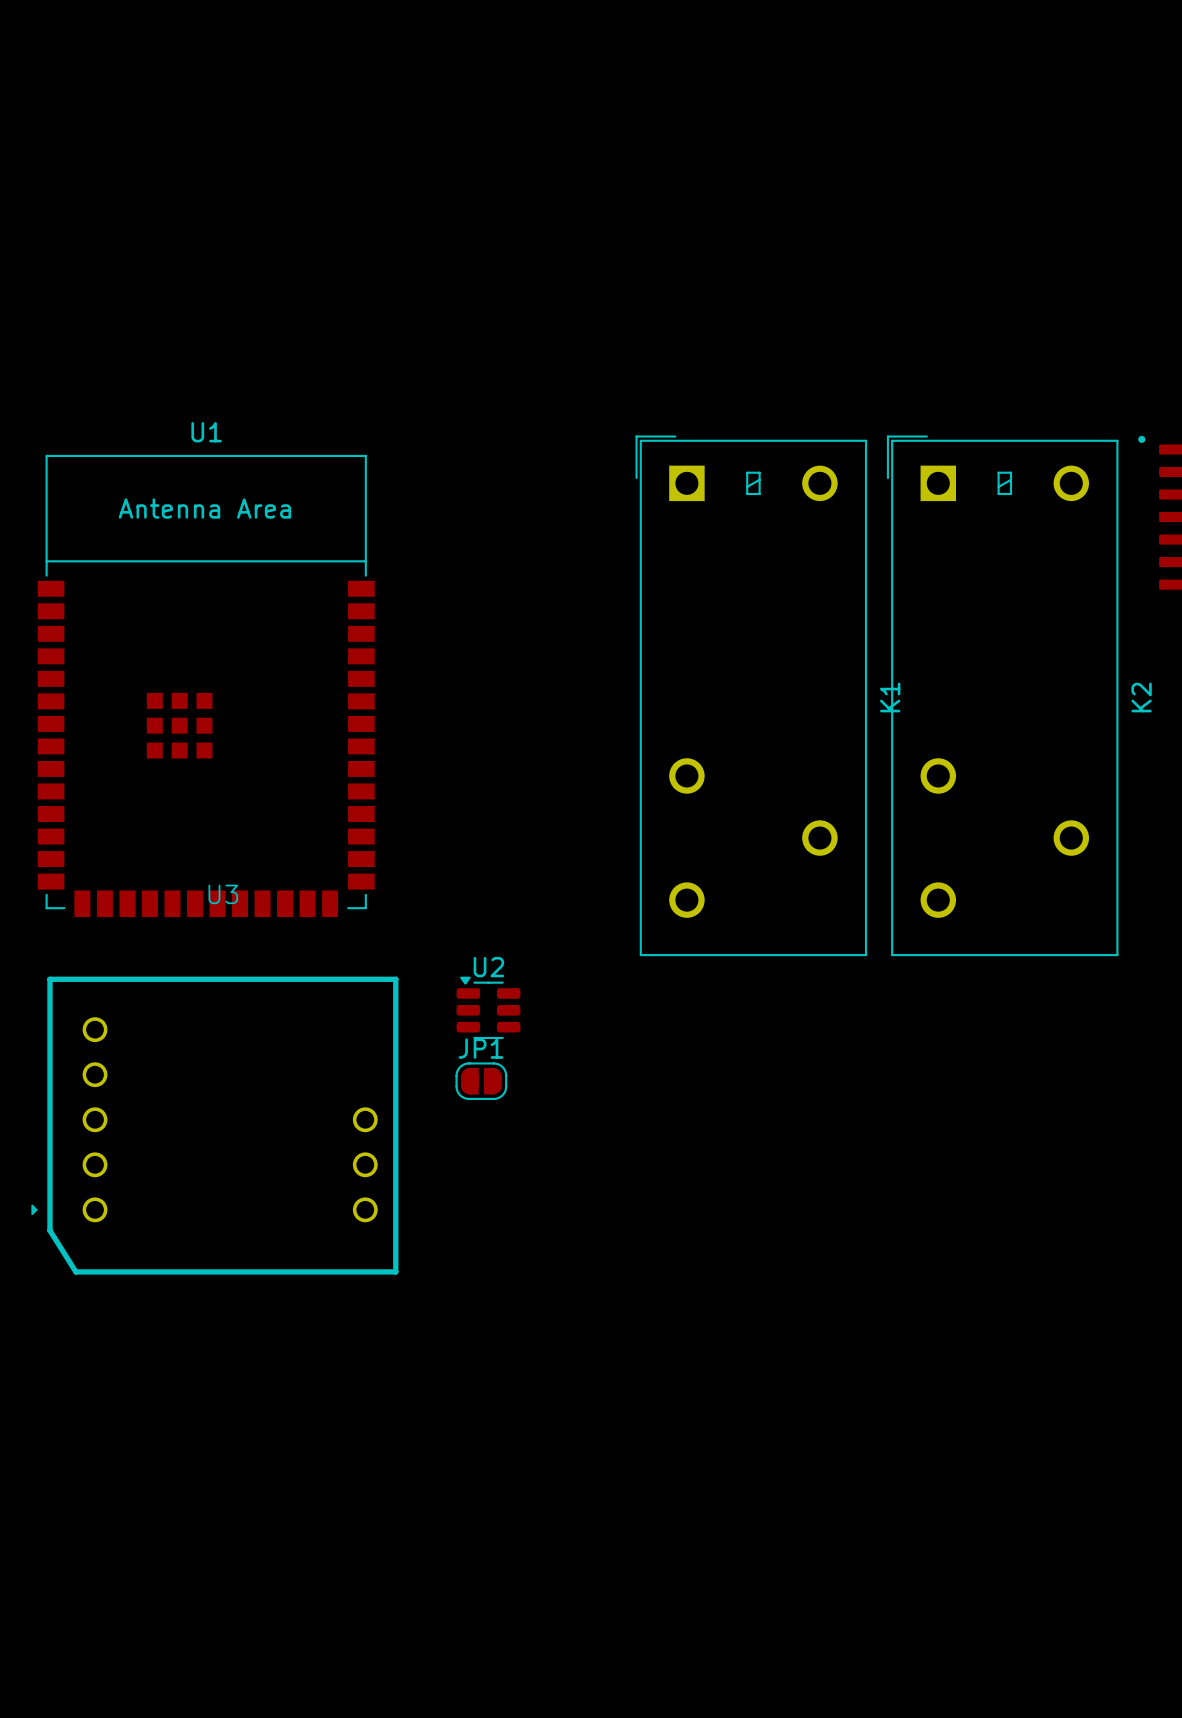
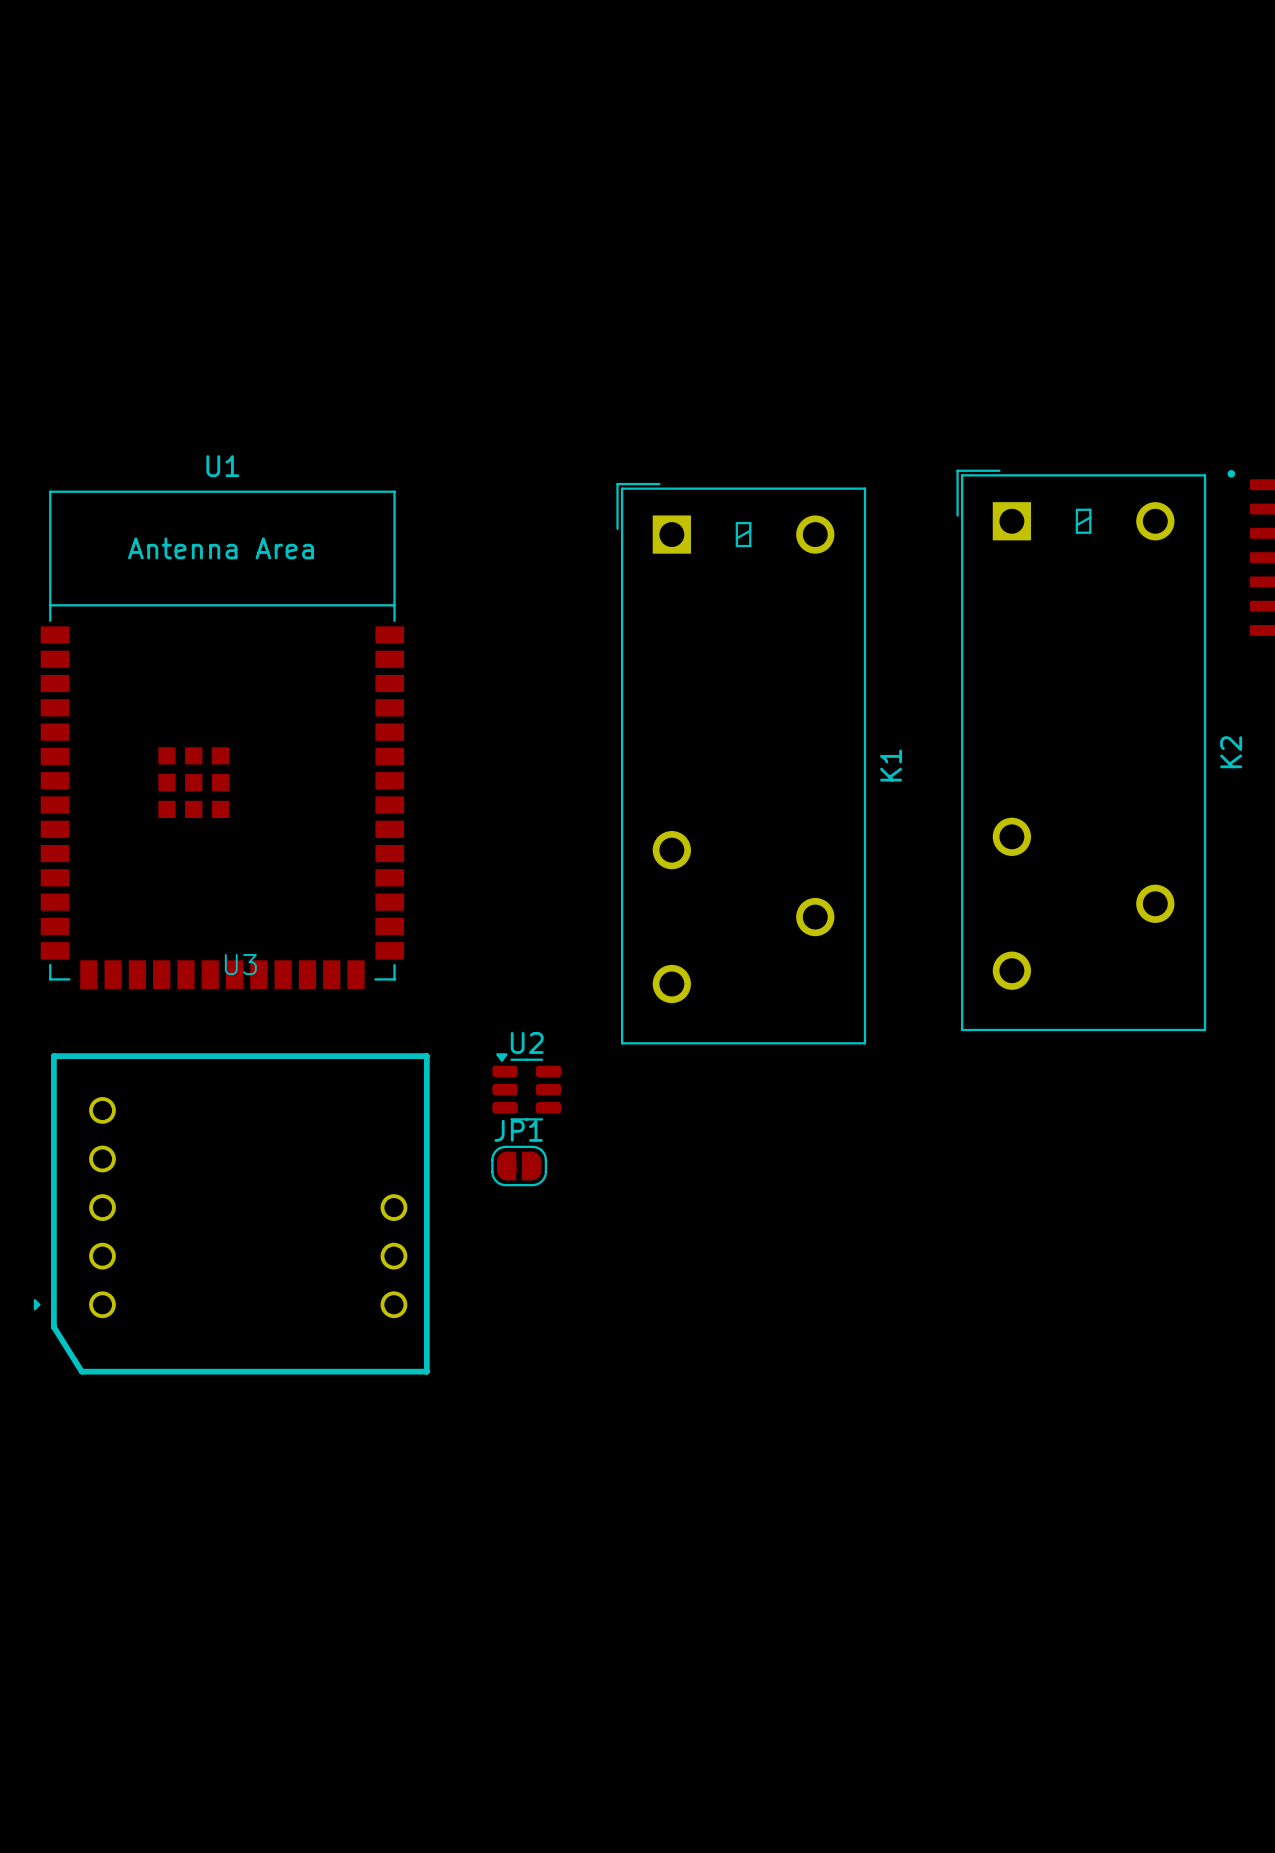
K1 position: (751, 695) -> (741, 763)

